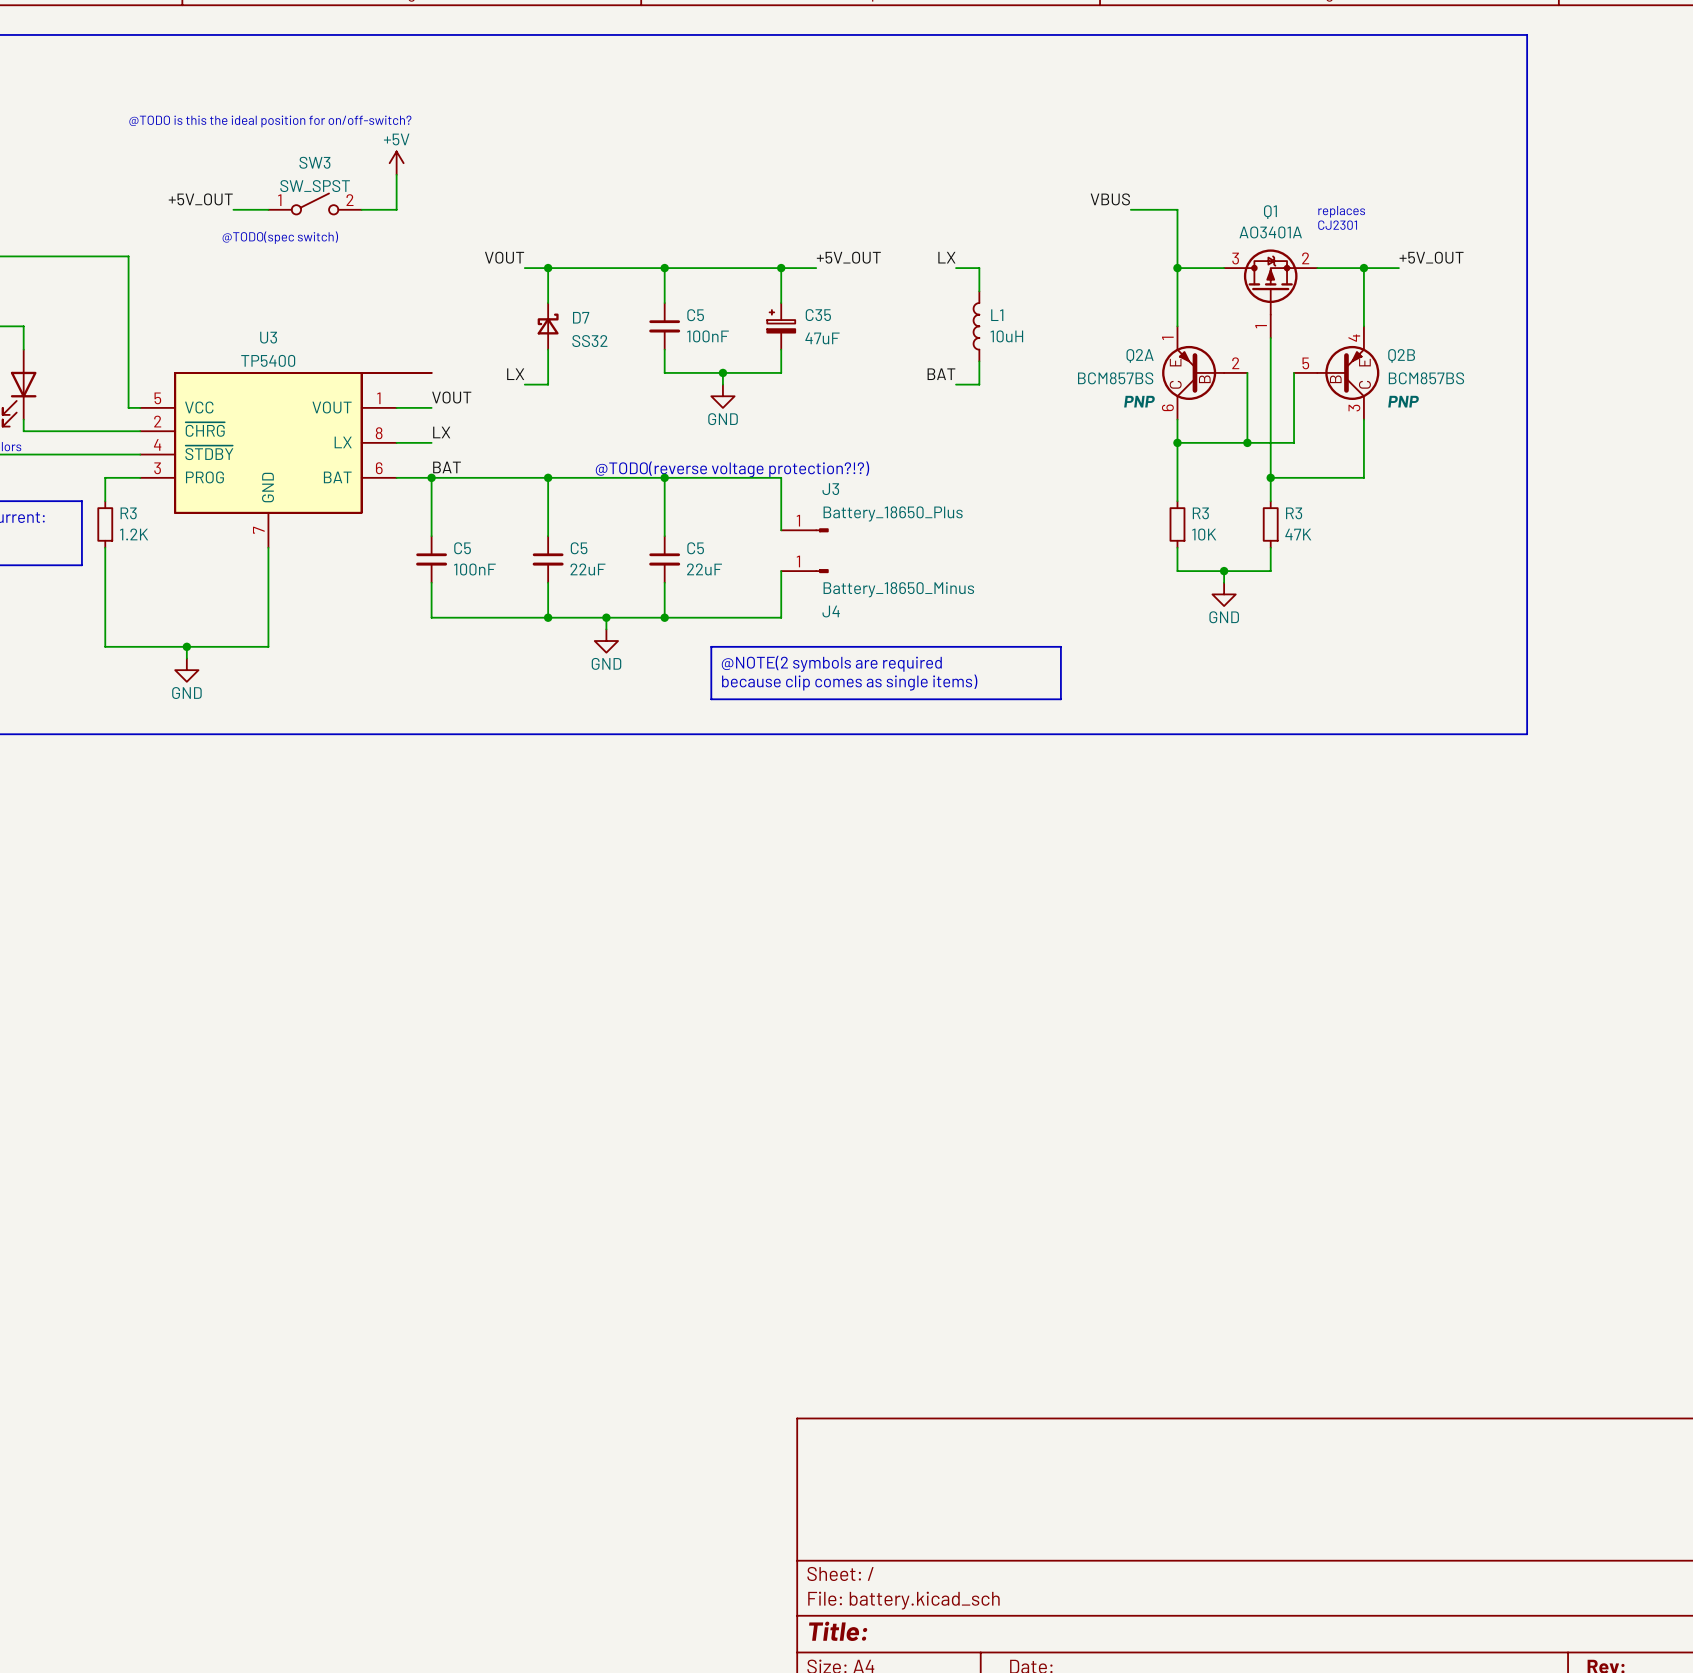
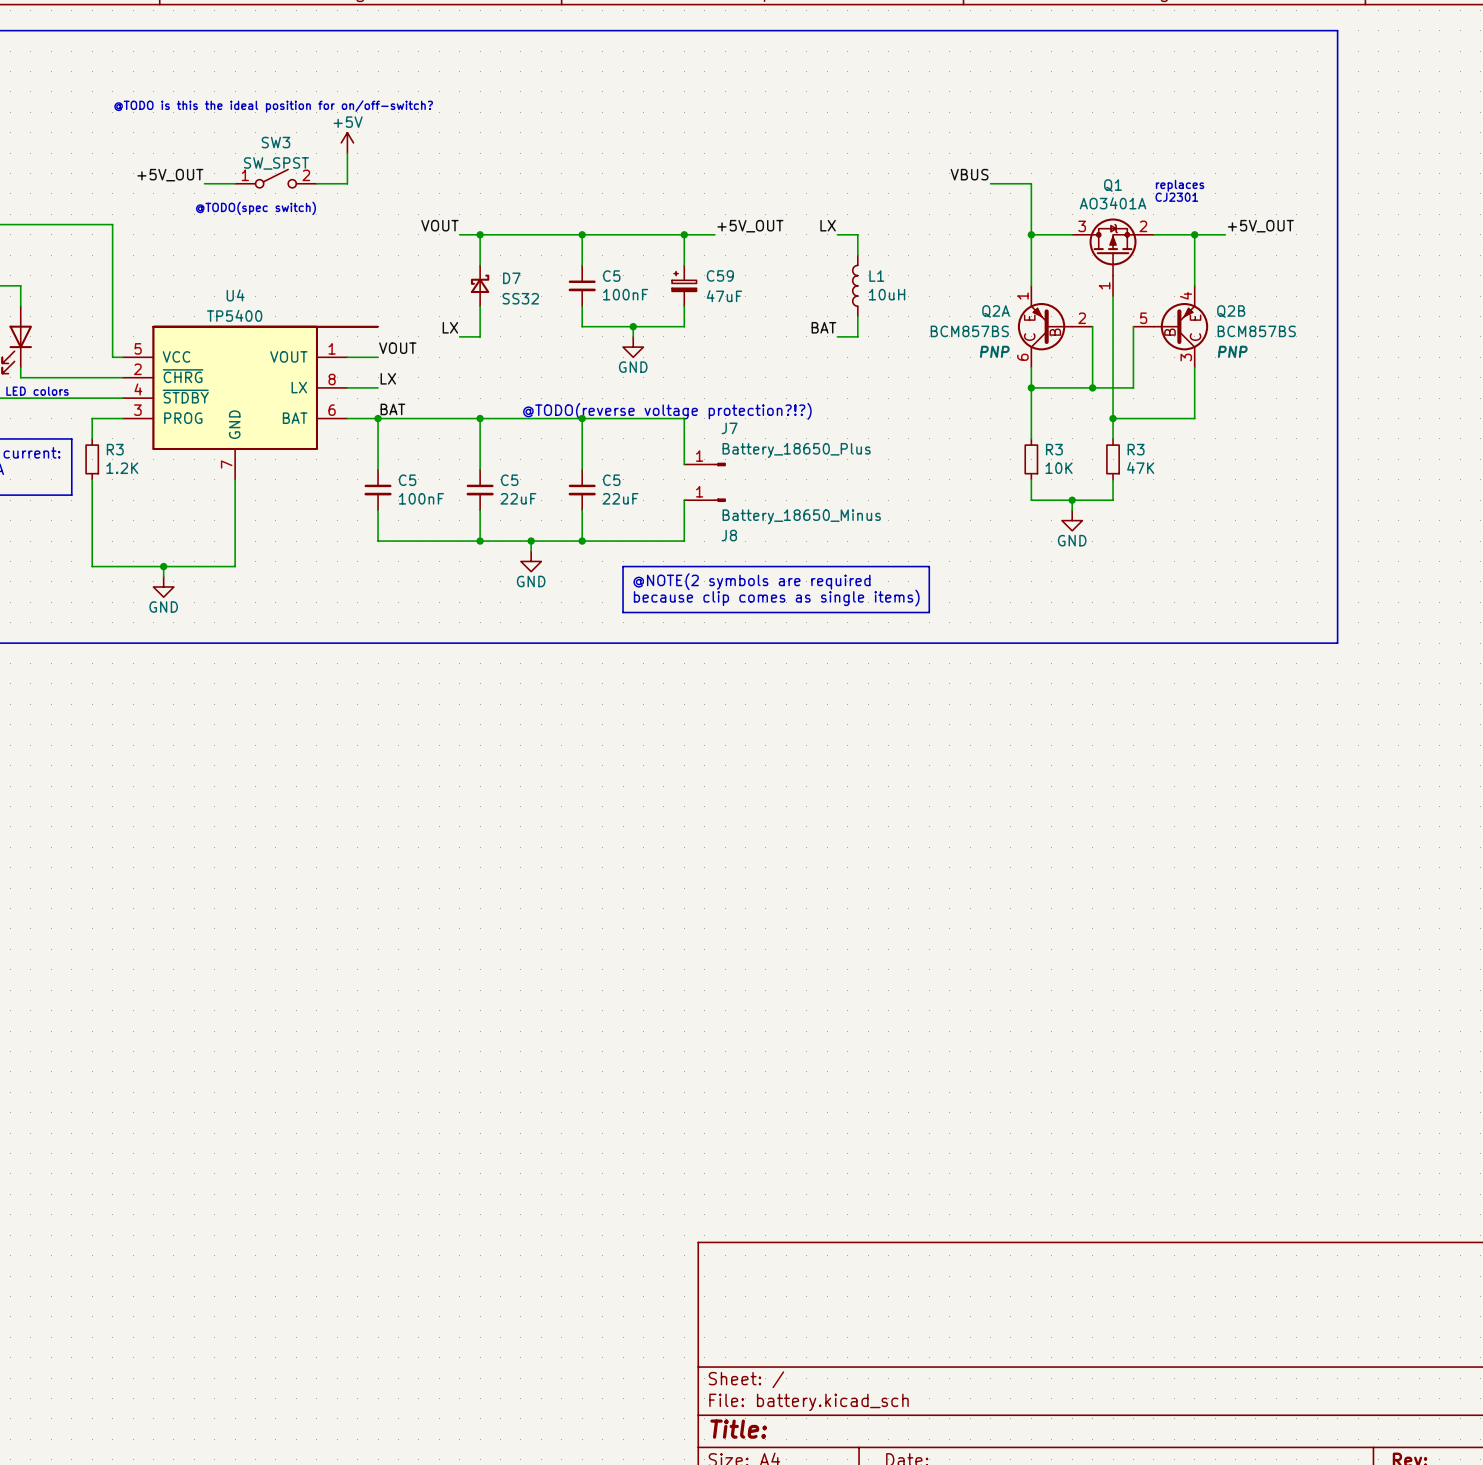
C35 name: C35 (818, 315) -> C59 (720, 275)
U3 name: U3 (268, 337) -> U4 (235, 295)
J3 name: J3 (830, 489) -> J7 (729, 428)
J4 name: J4 (831, 611) -> J8 (729, 535)

